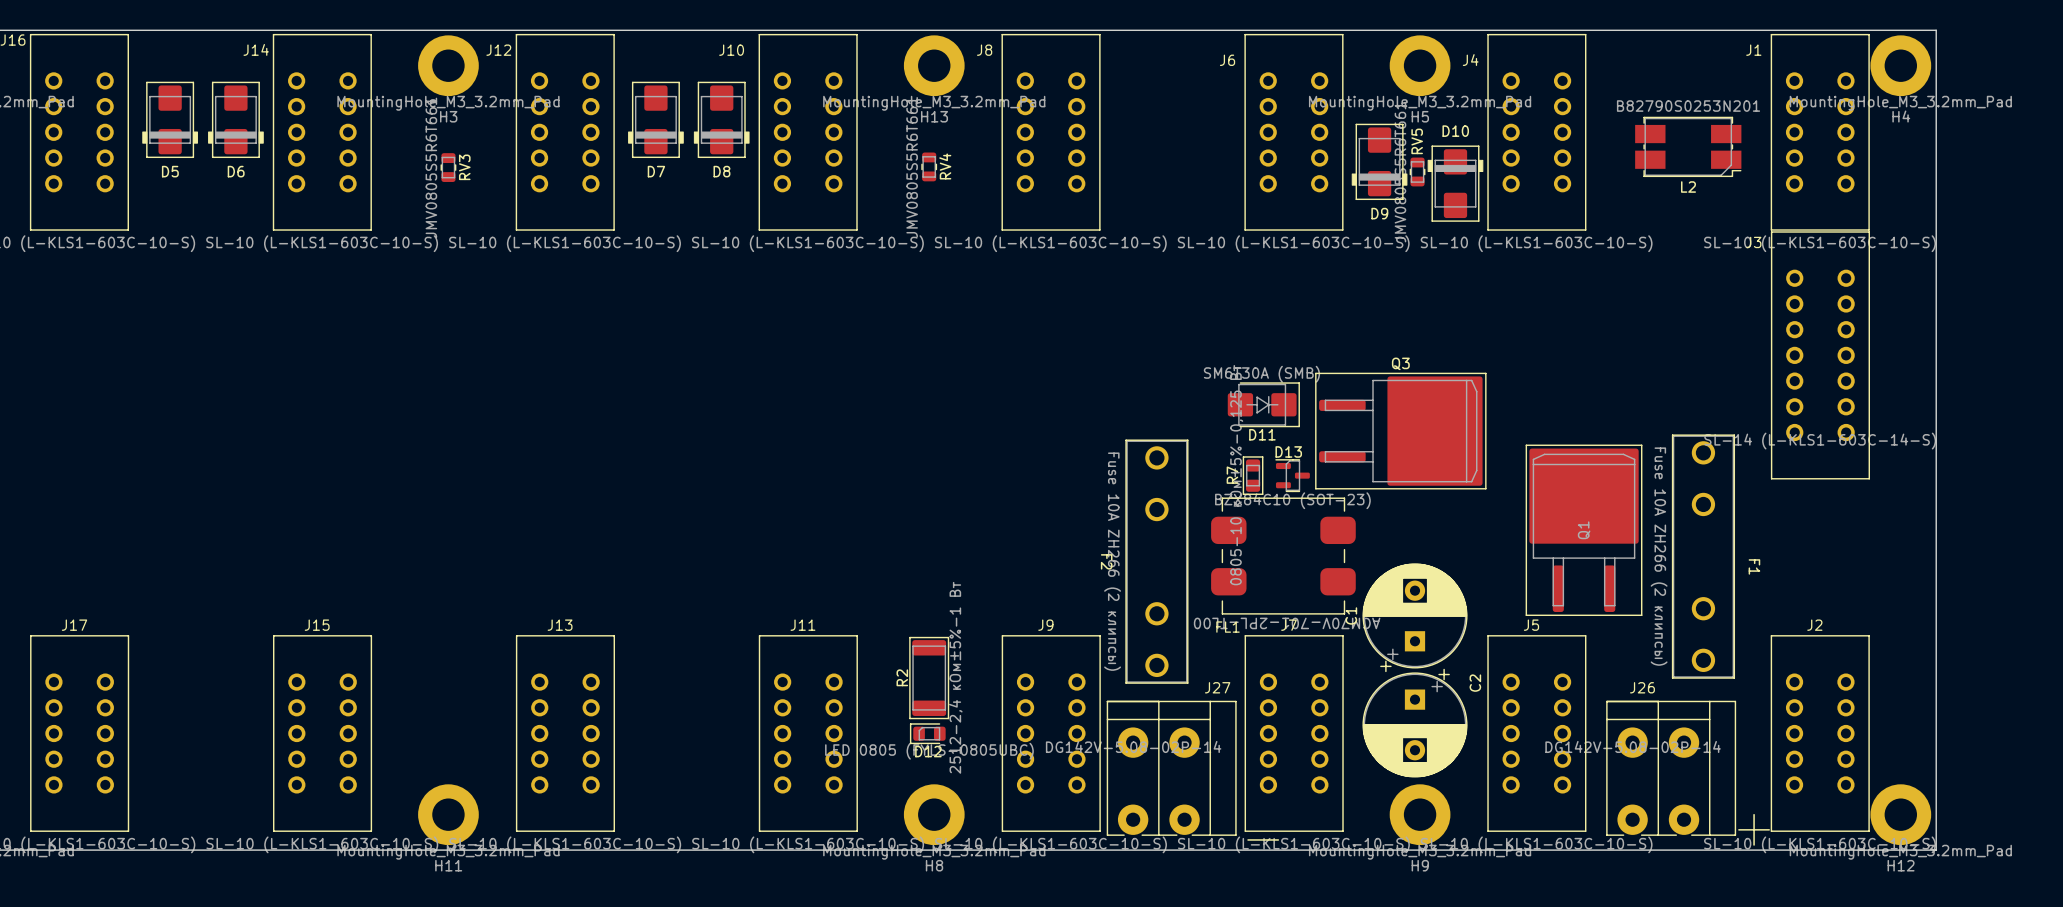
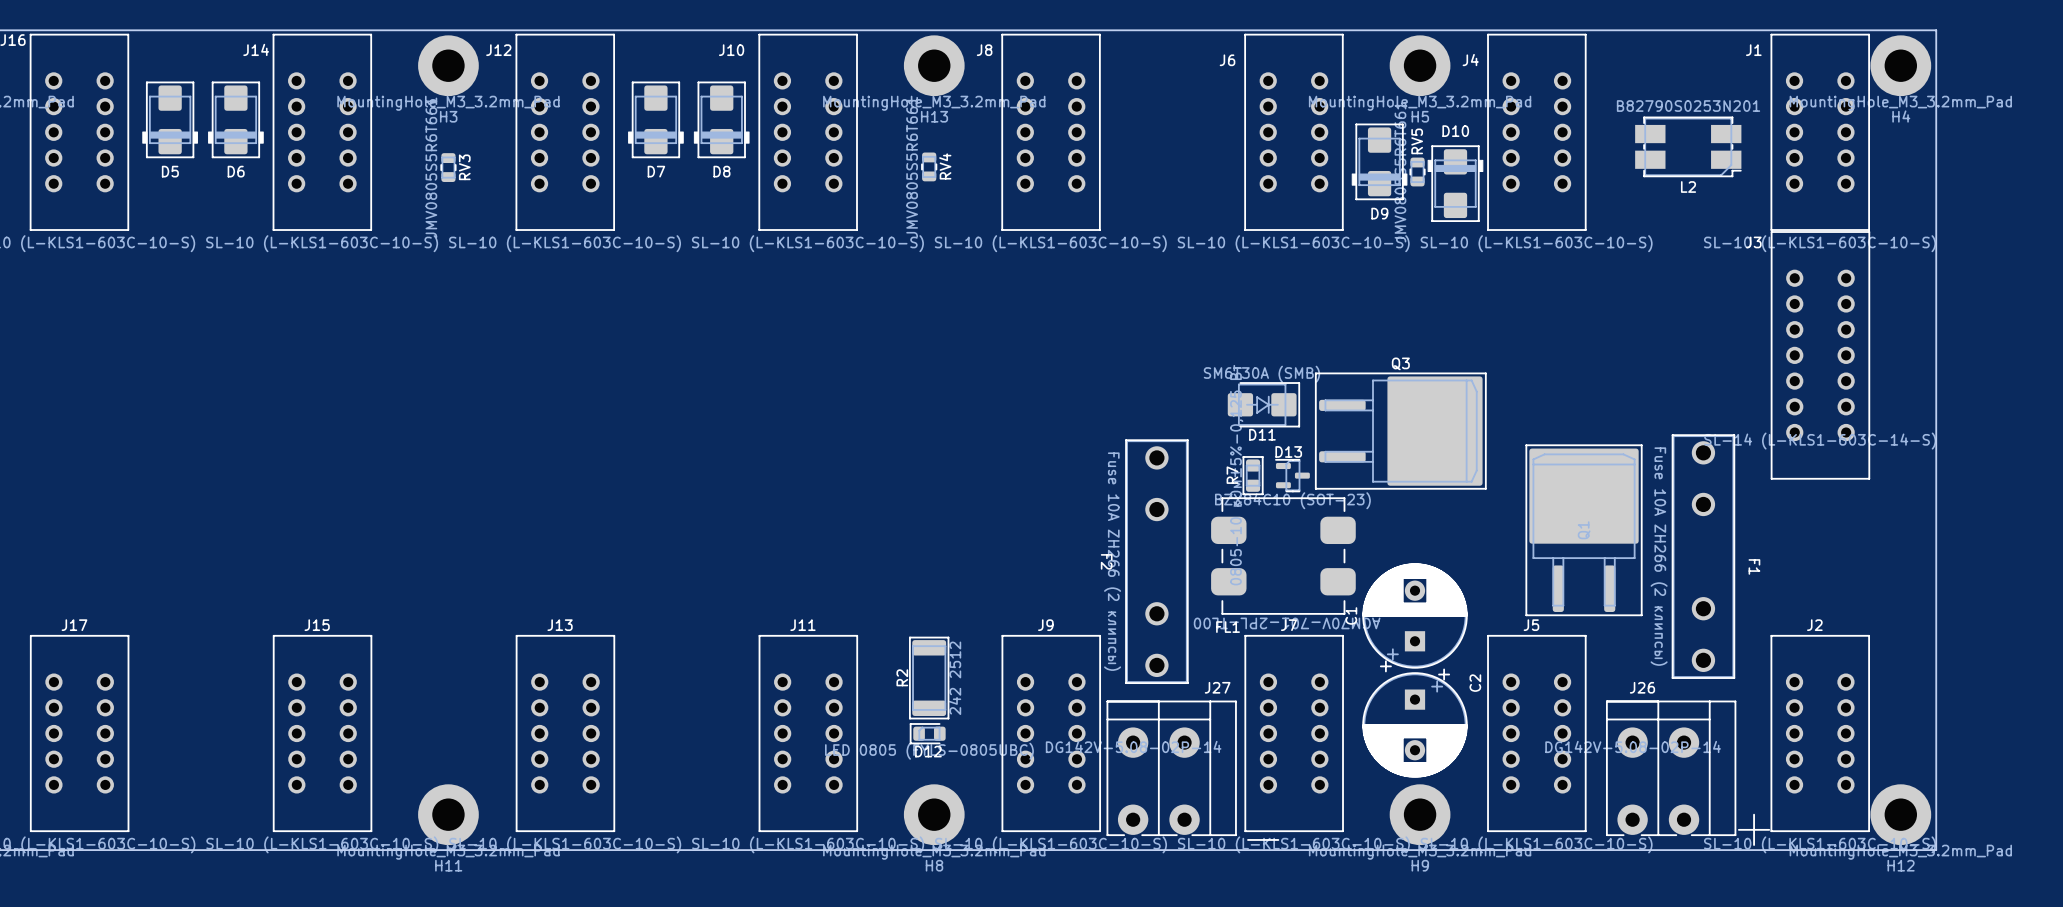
R2 value: 2512-2,4 кОм±5%-1 Вт (955, 677) -> 242 2512 (955, 678)

